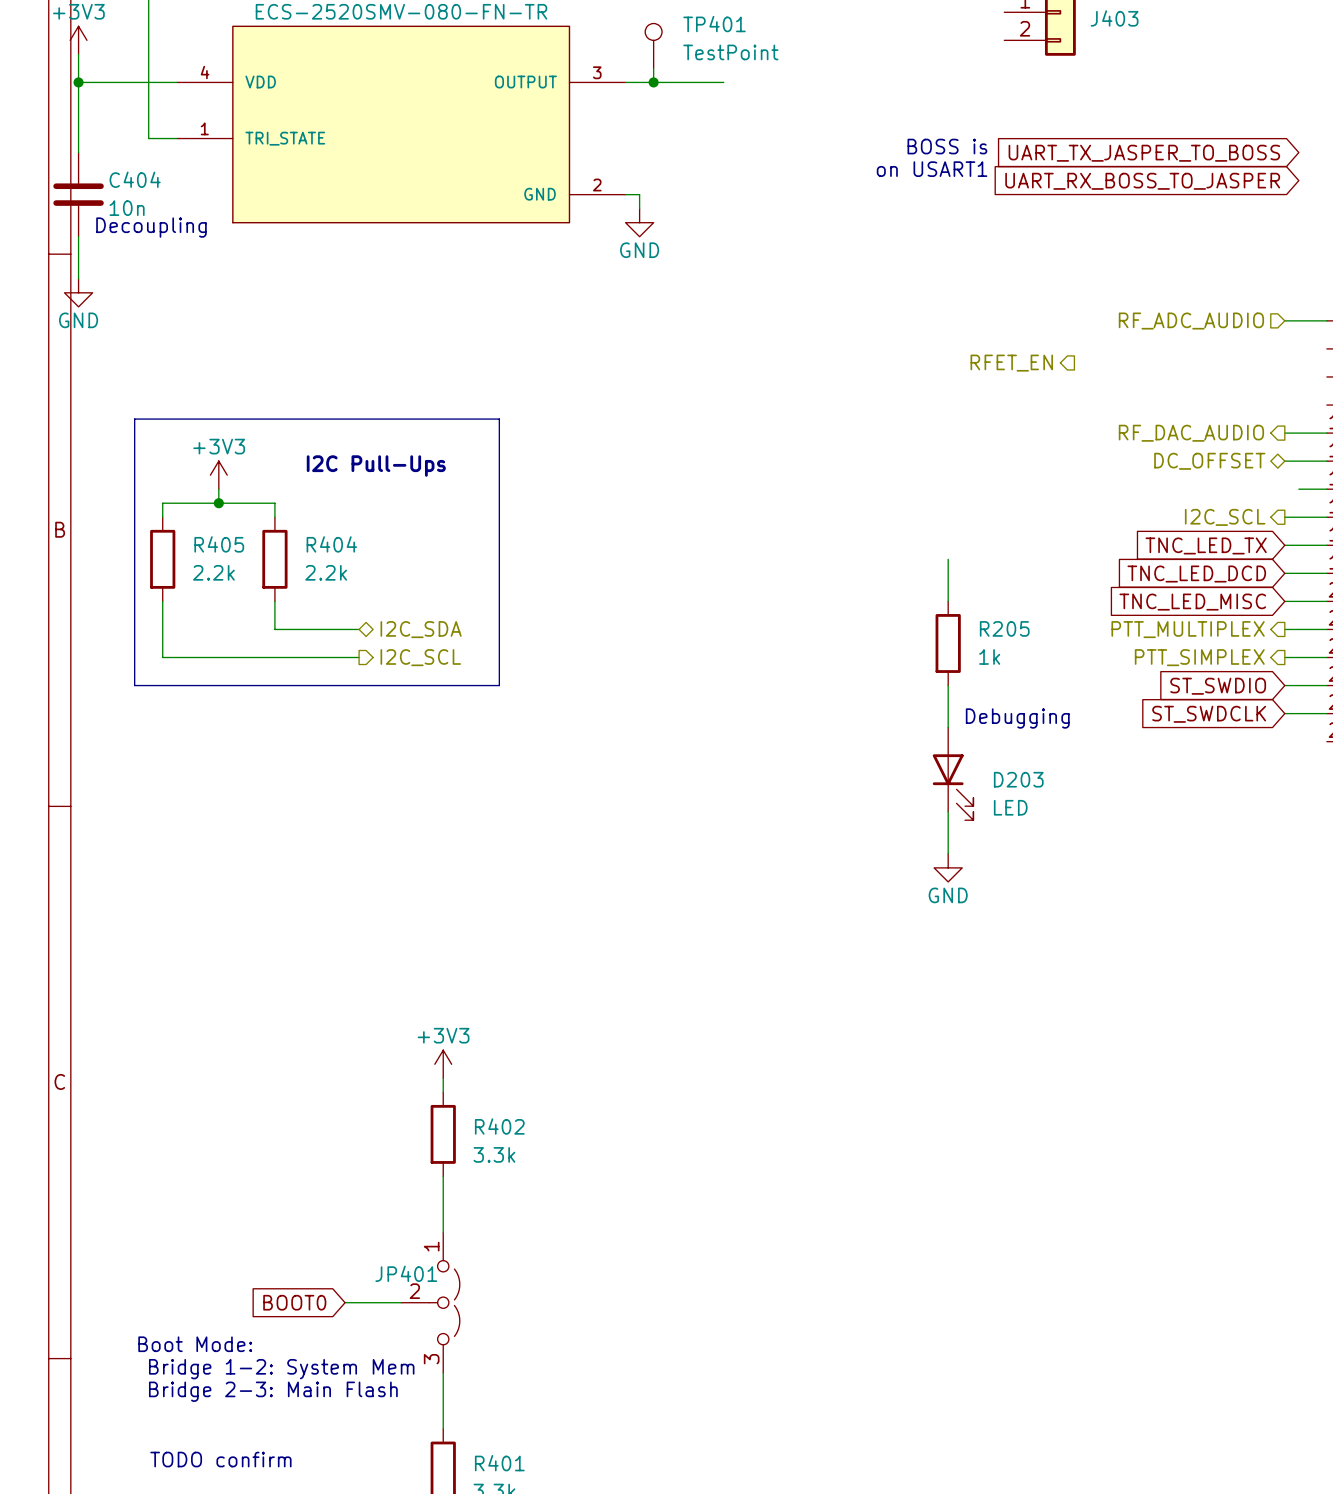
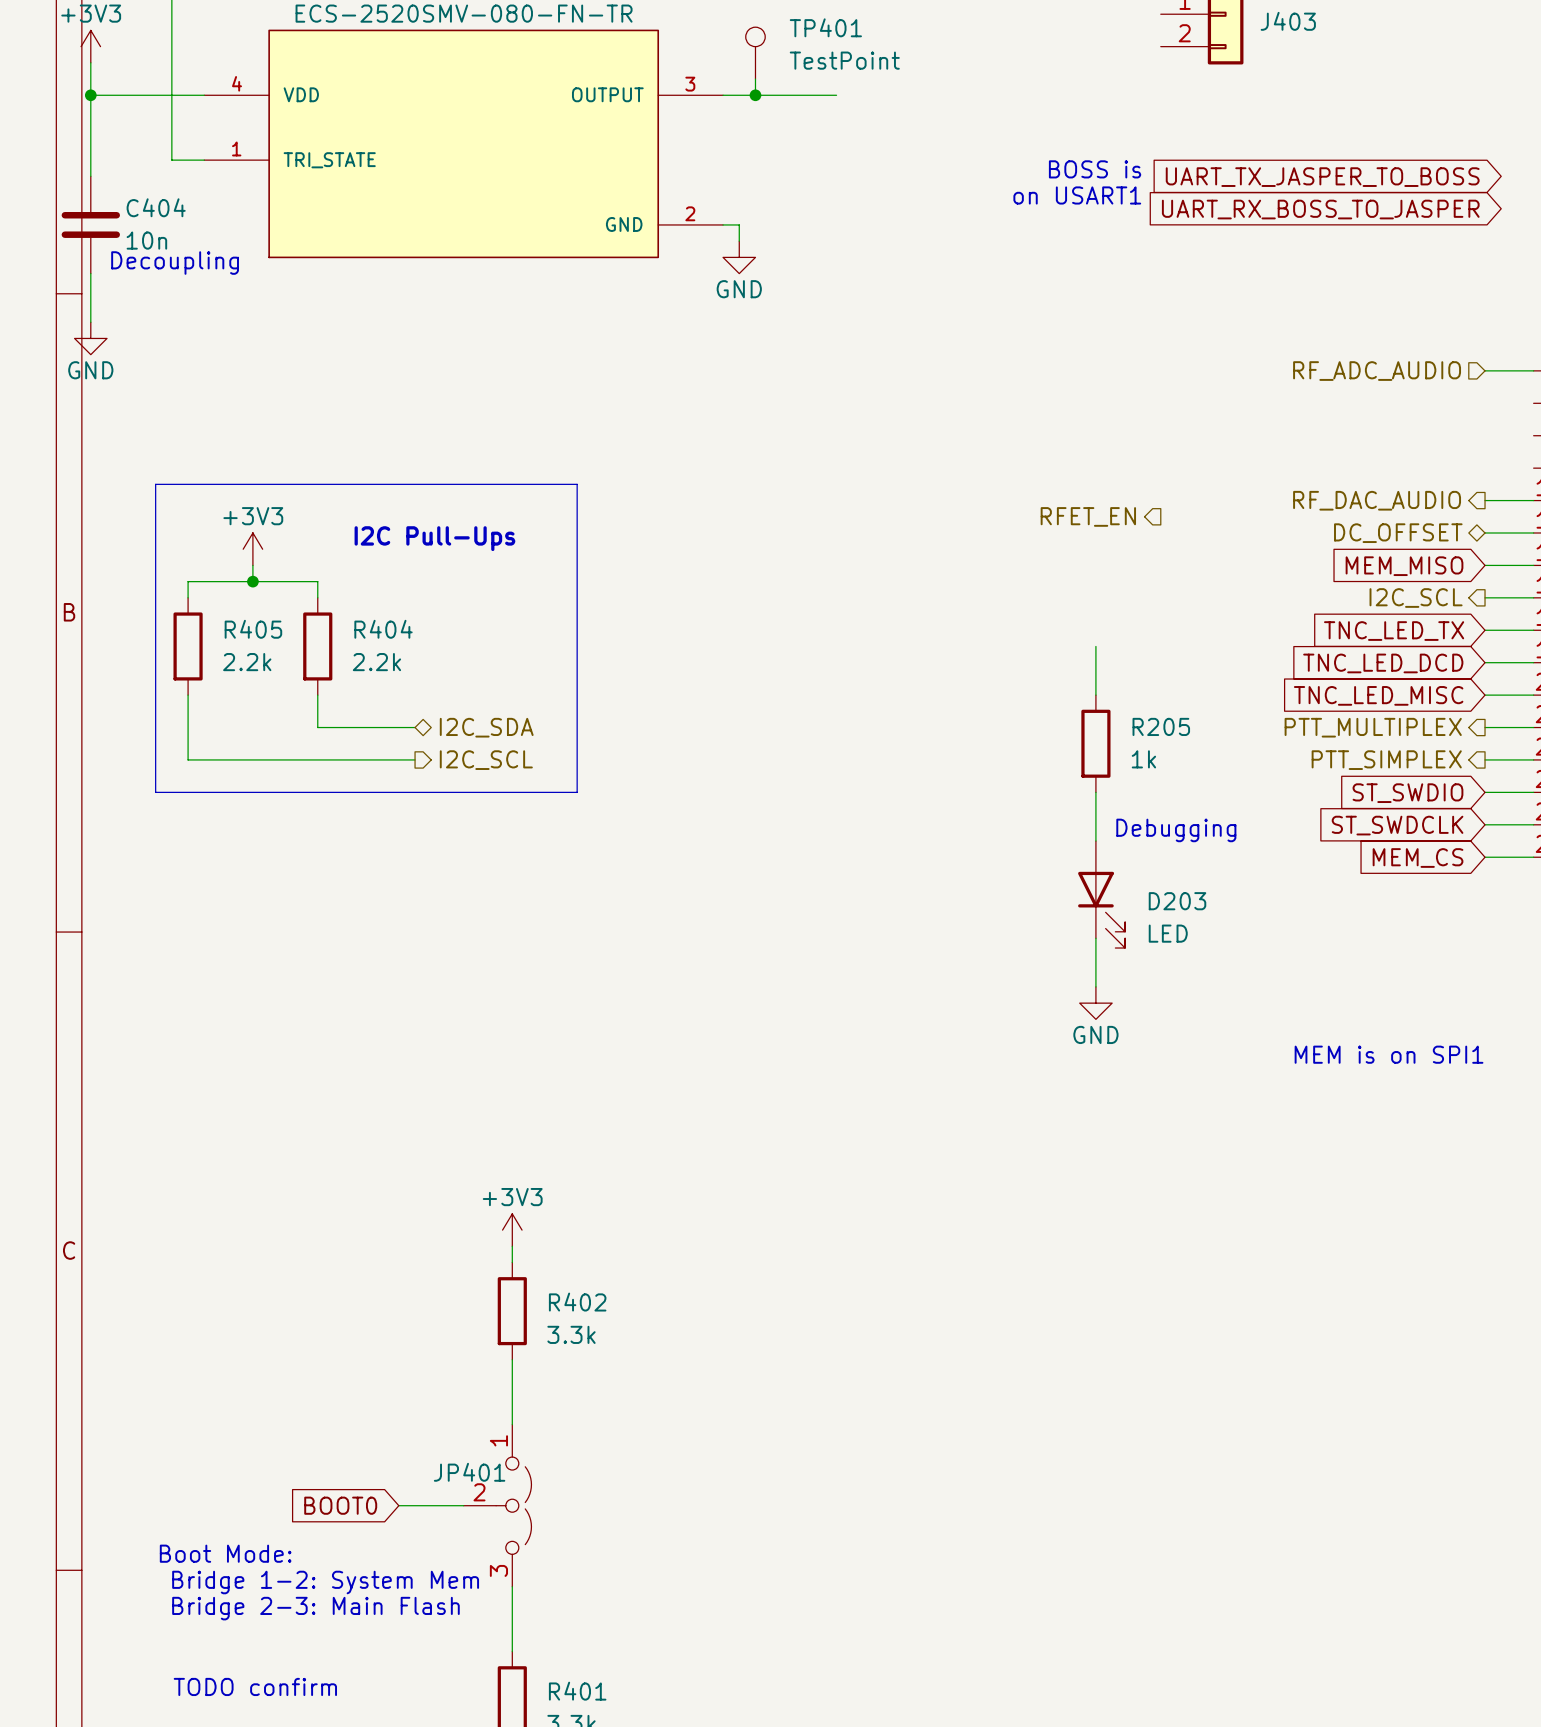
hierarchical label position: RFET_EN (1011, 363) -> RFET_EN (1088, 516)
global label: none -> MEM_MISO (1404, 566)
wire: none -> (1485, 565) (1501, 565)
wire: none -> (1485, 857) (1533, 857)
global label: none -> MEM_CS (1418, 858)
text: none -> MEM is on SPI1 (1389, 1054)

